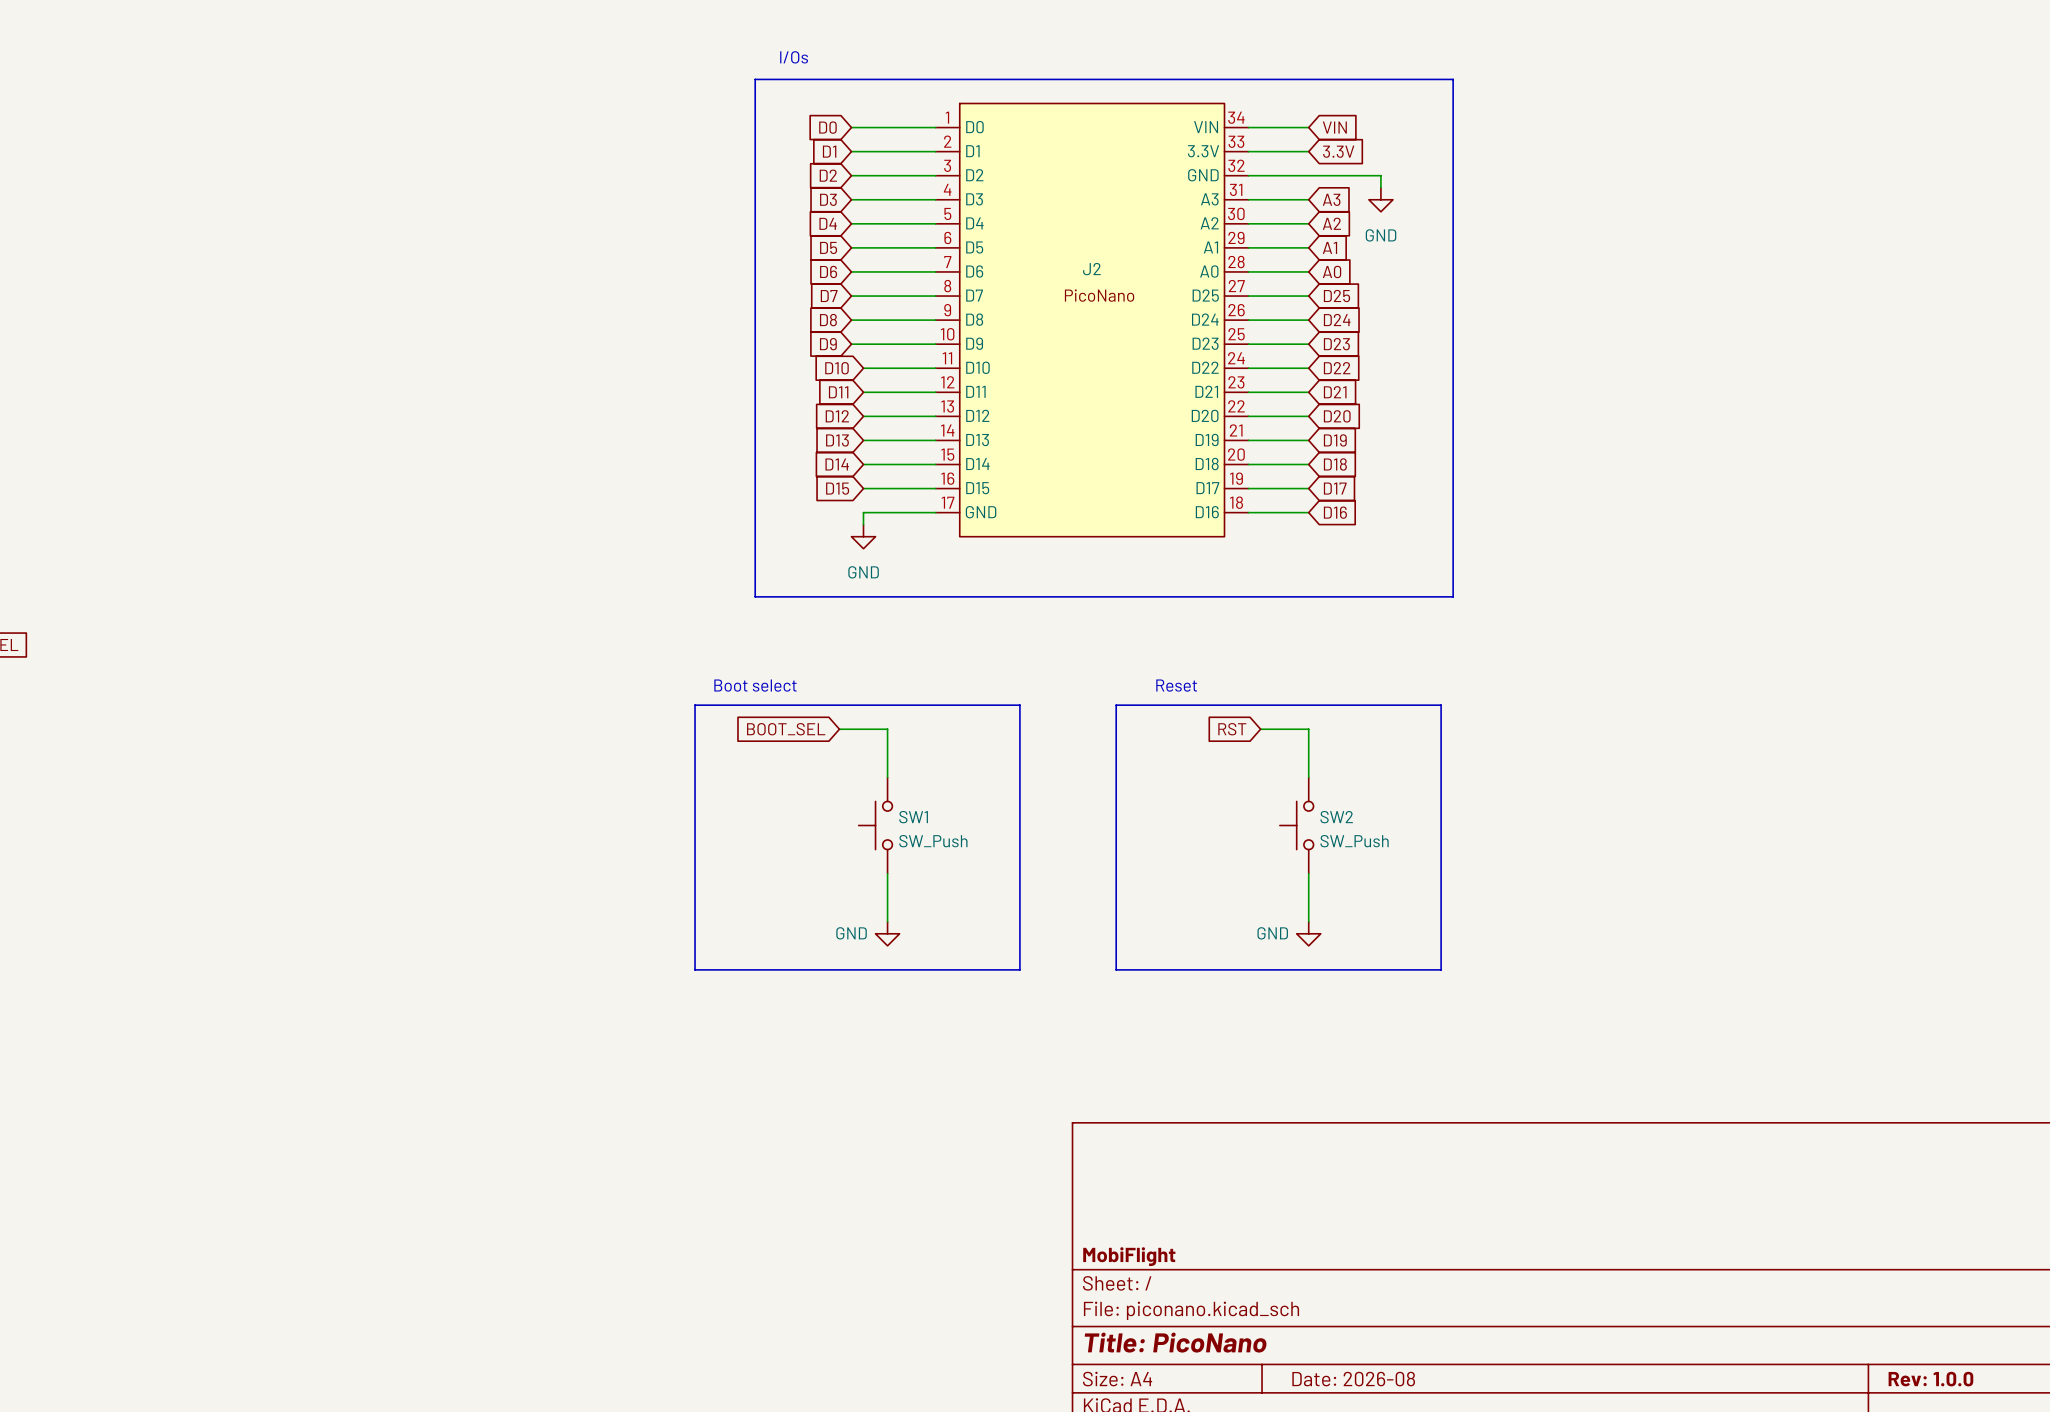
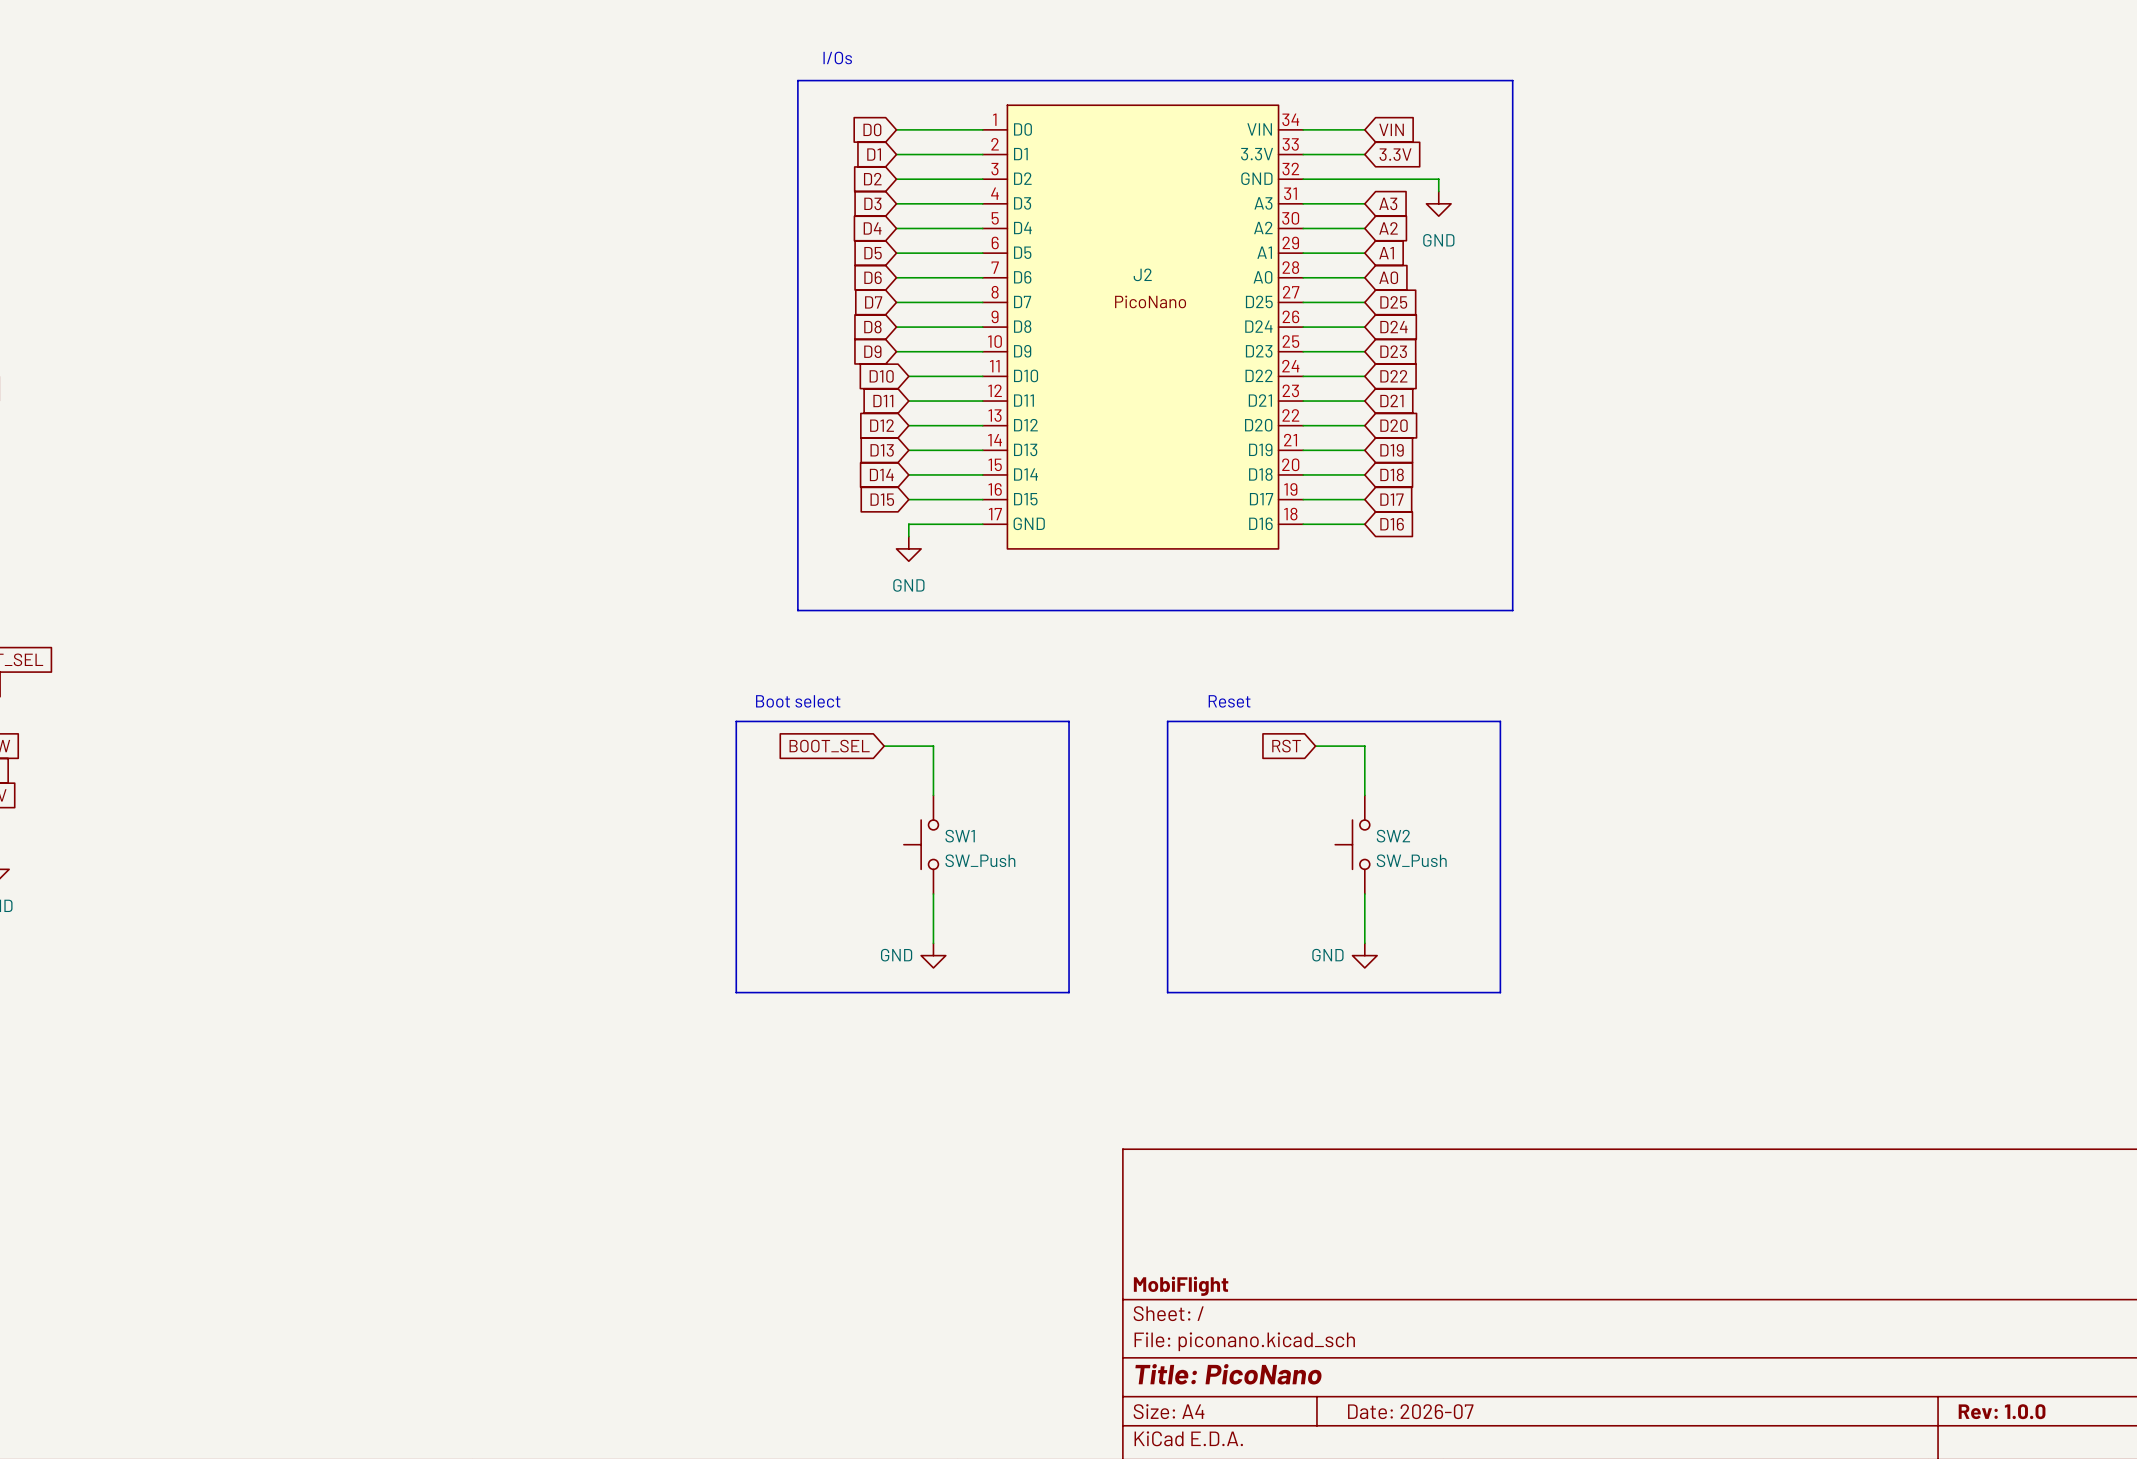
title block: Date: 2026-08 (1353, 1379) -> Date: 2026-07 (1410, 1411)

